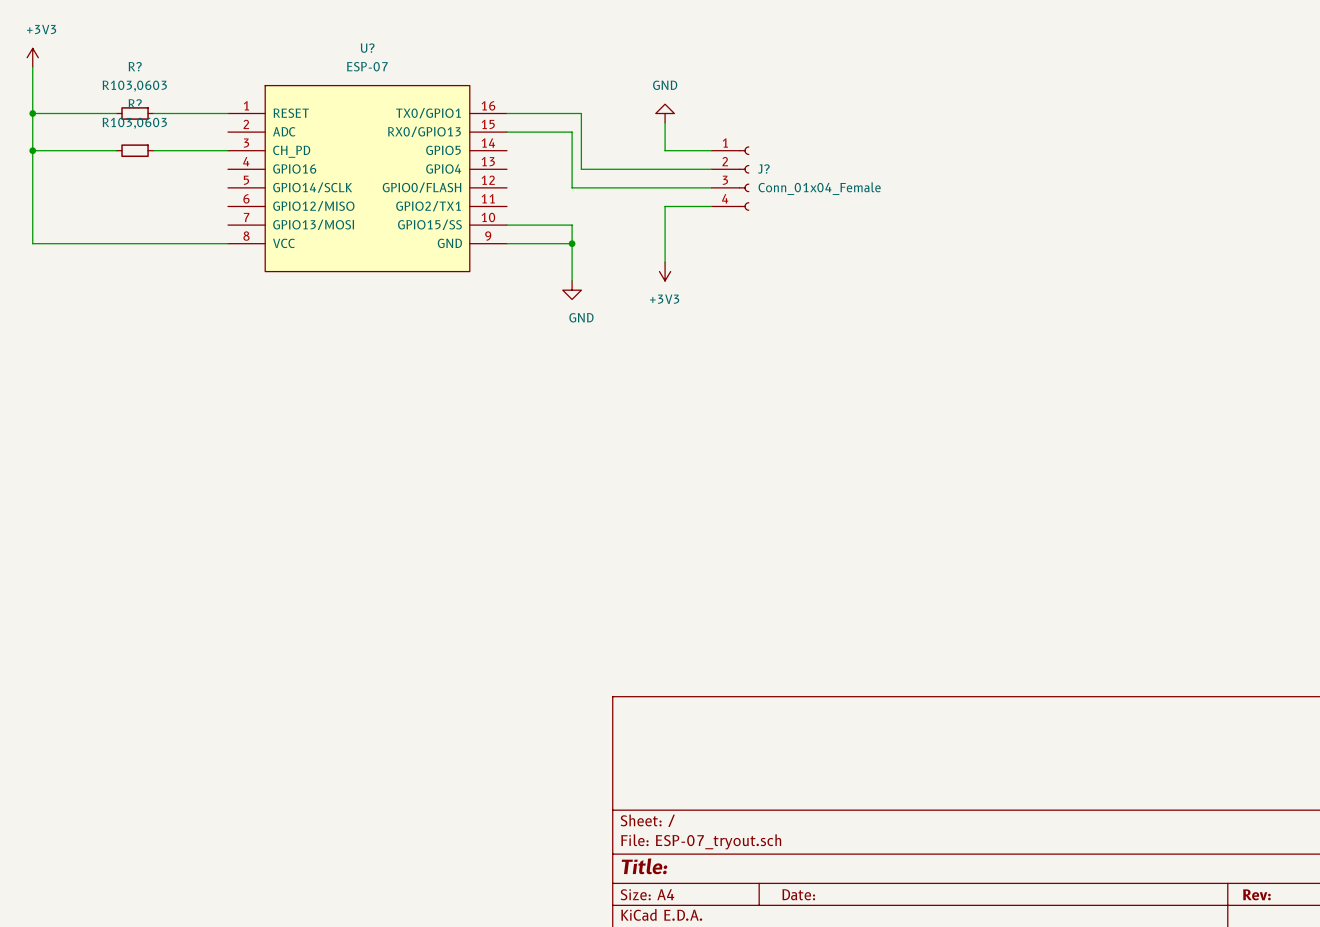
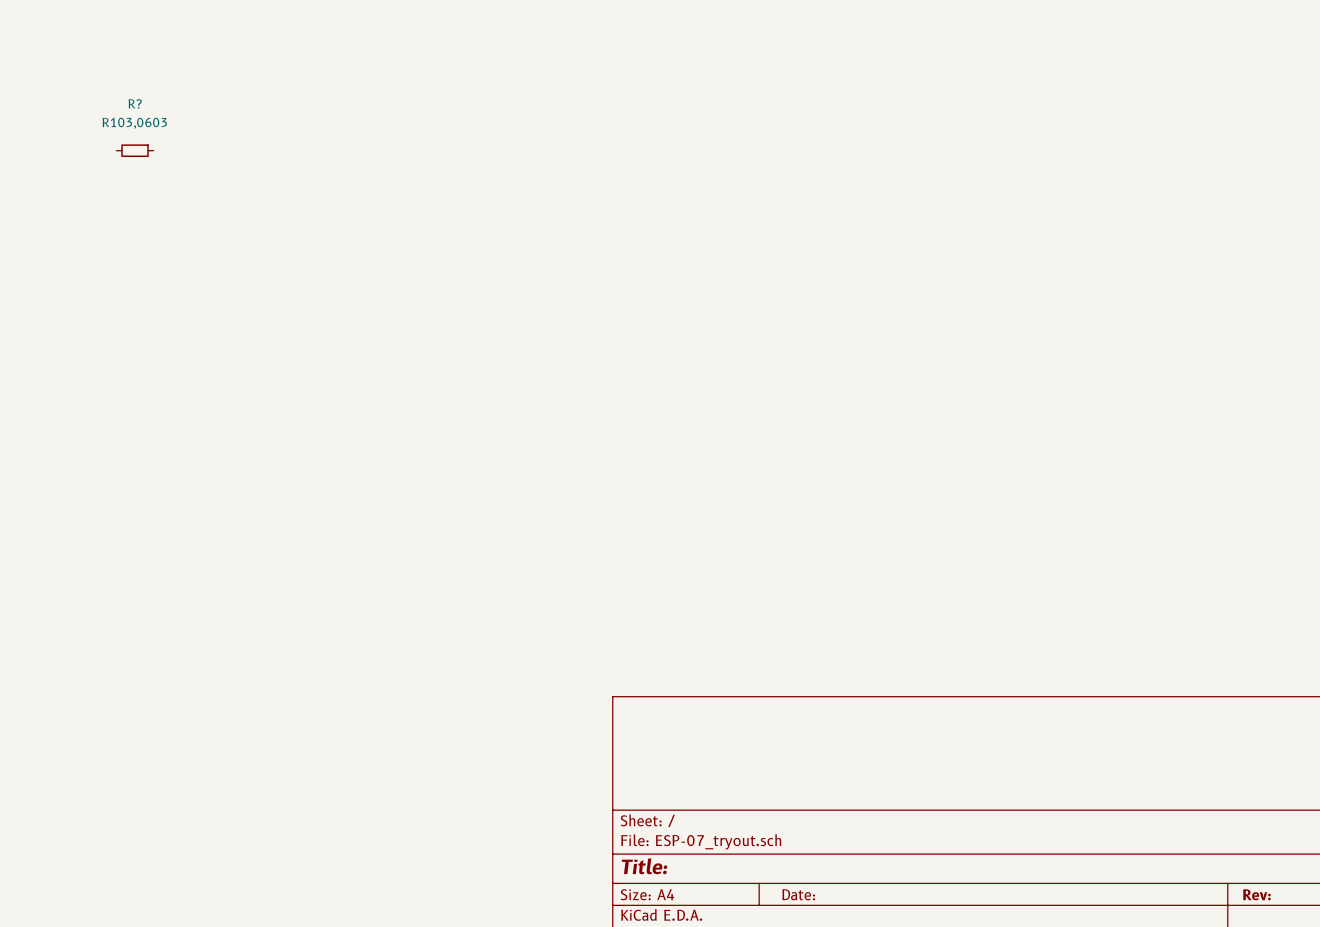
power symbol: +3V3 (32, 57) -> none
wire: (32, 67) (32, 243) (228, 243) -> none
wire: (32, 113) (116, 113) -> none
junction: (32, 113) -> none
R?: R103,0603 (135, 113) -> none
wire: (153, 113) (228, 113) -> none
wire: (506, 113) (581, 113) (581, 169) (711, 169) -> none
power symbol: GND (665, 113) -> none
wire: (665, 122) (665, 150) (711, 150) -> none
wire: (506, 132) (572, 132) (572, 187) (711, 187) -> none
wire: (32, 150) (116, 150) -> none
junction: (32, 150) -> none
wire: (153, 150) (228, 150) -> none
U?: ESP-07 (367, 178) -> none
J?: Conn_01x04_Female (730, 178) -> none
wire: (711, 206) (665, 206) (665, 262) -> none
wire: (506, 225) (572, 225) (572, 280) -> none
wire: (506, 243) (572, 243) -> none
junction: (572, 243) -> none
power symbol: +3V3 (665, 271) -> none
power symbol: GND (572, 290) -> none

